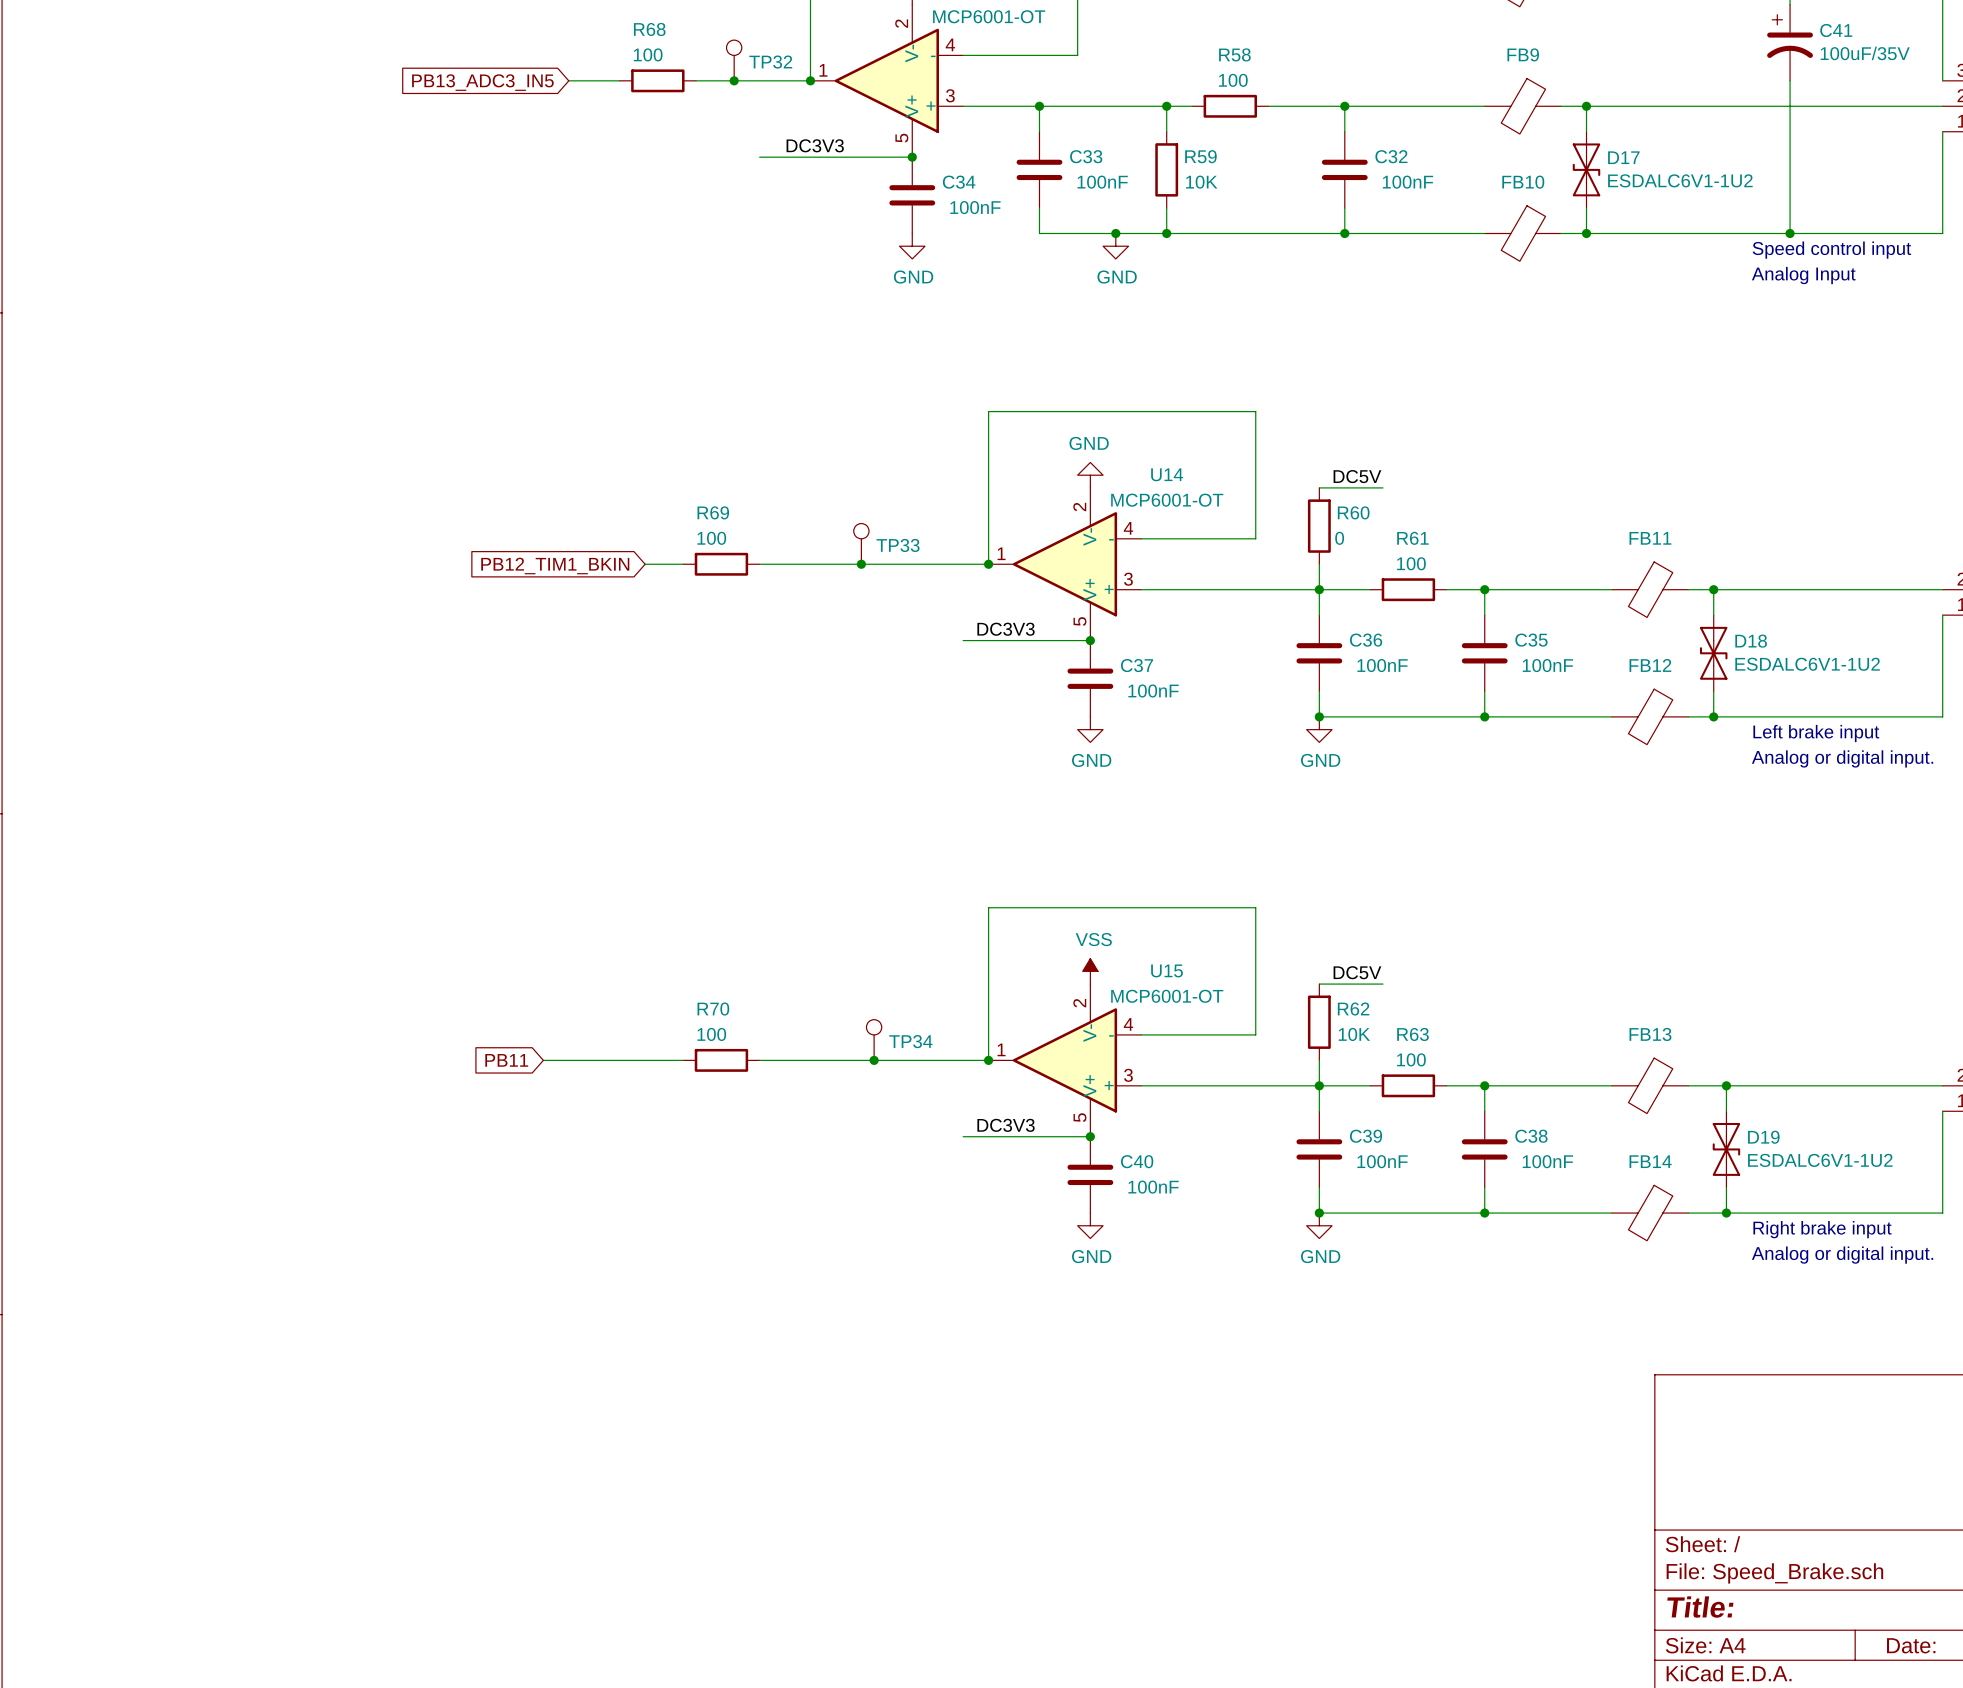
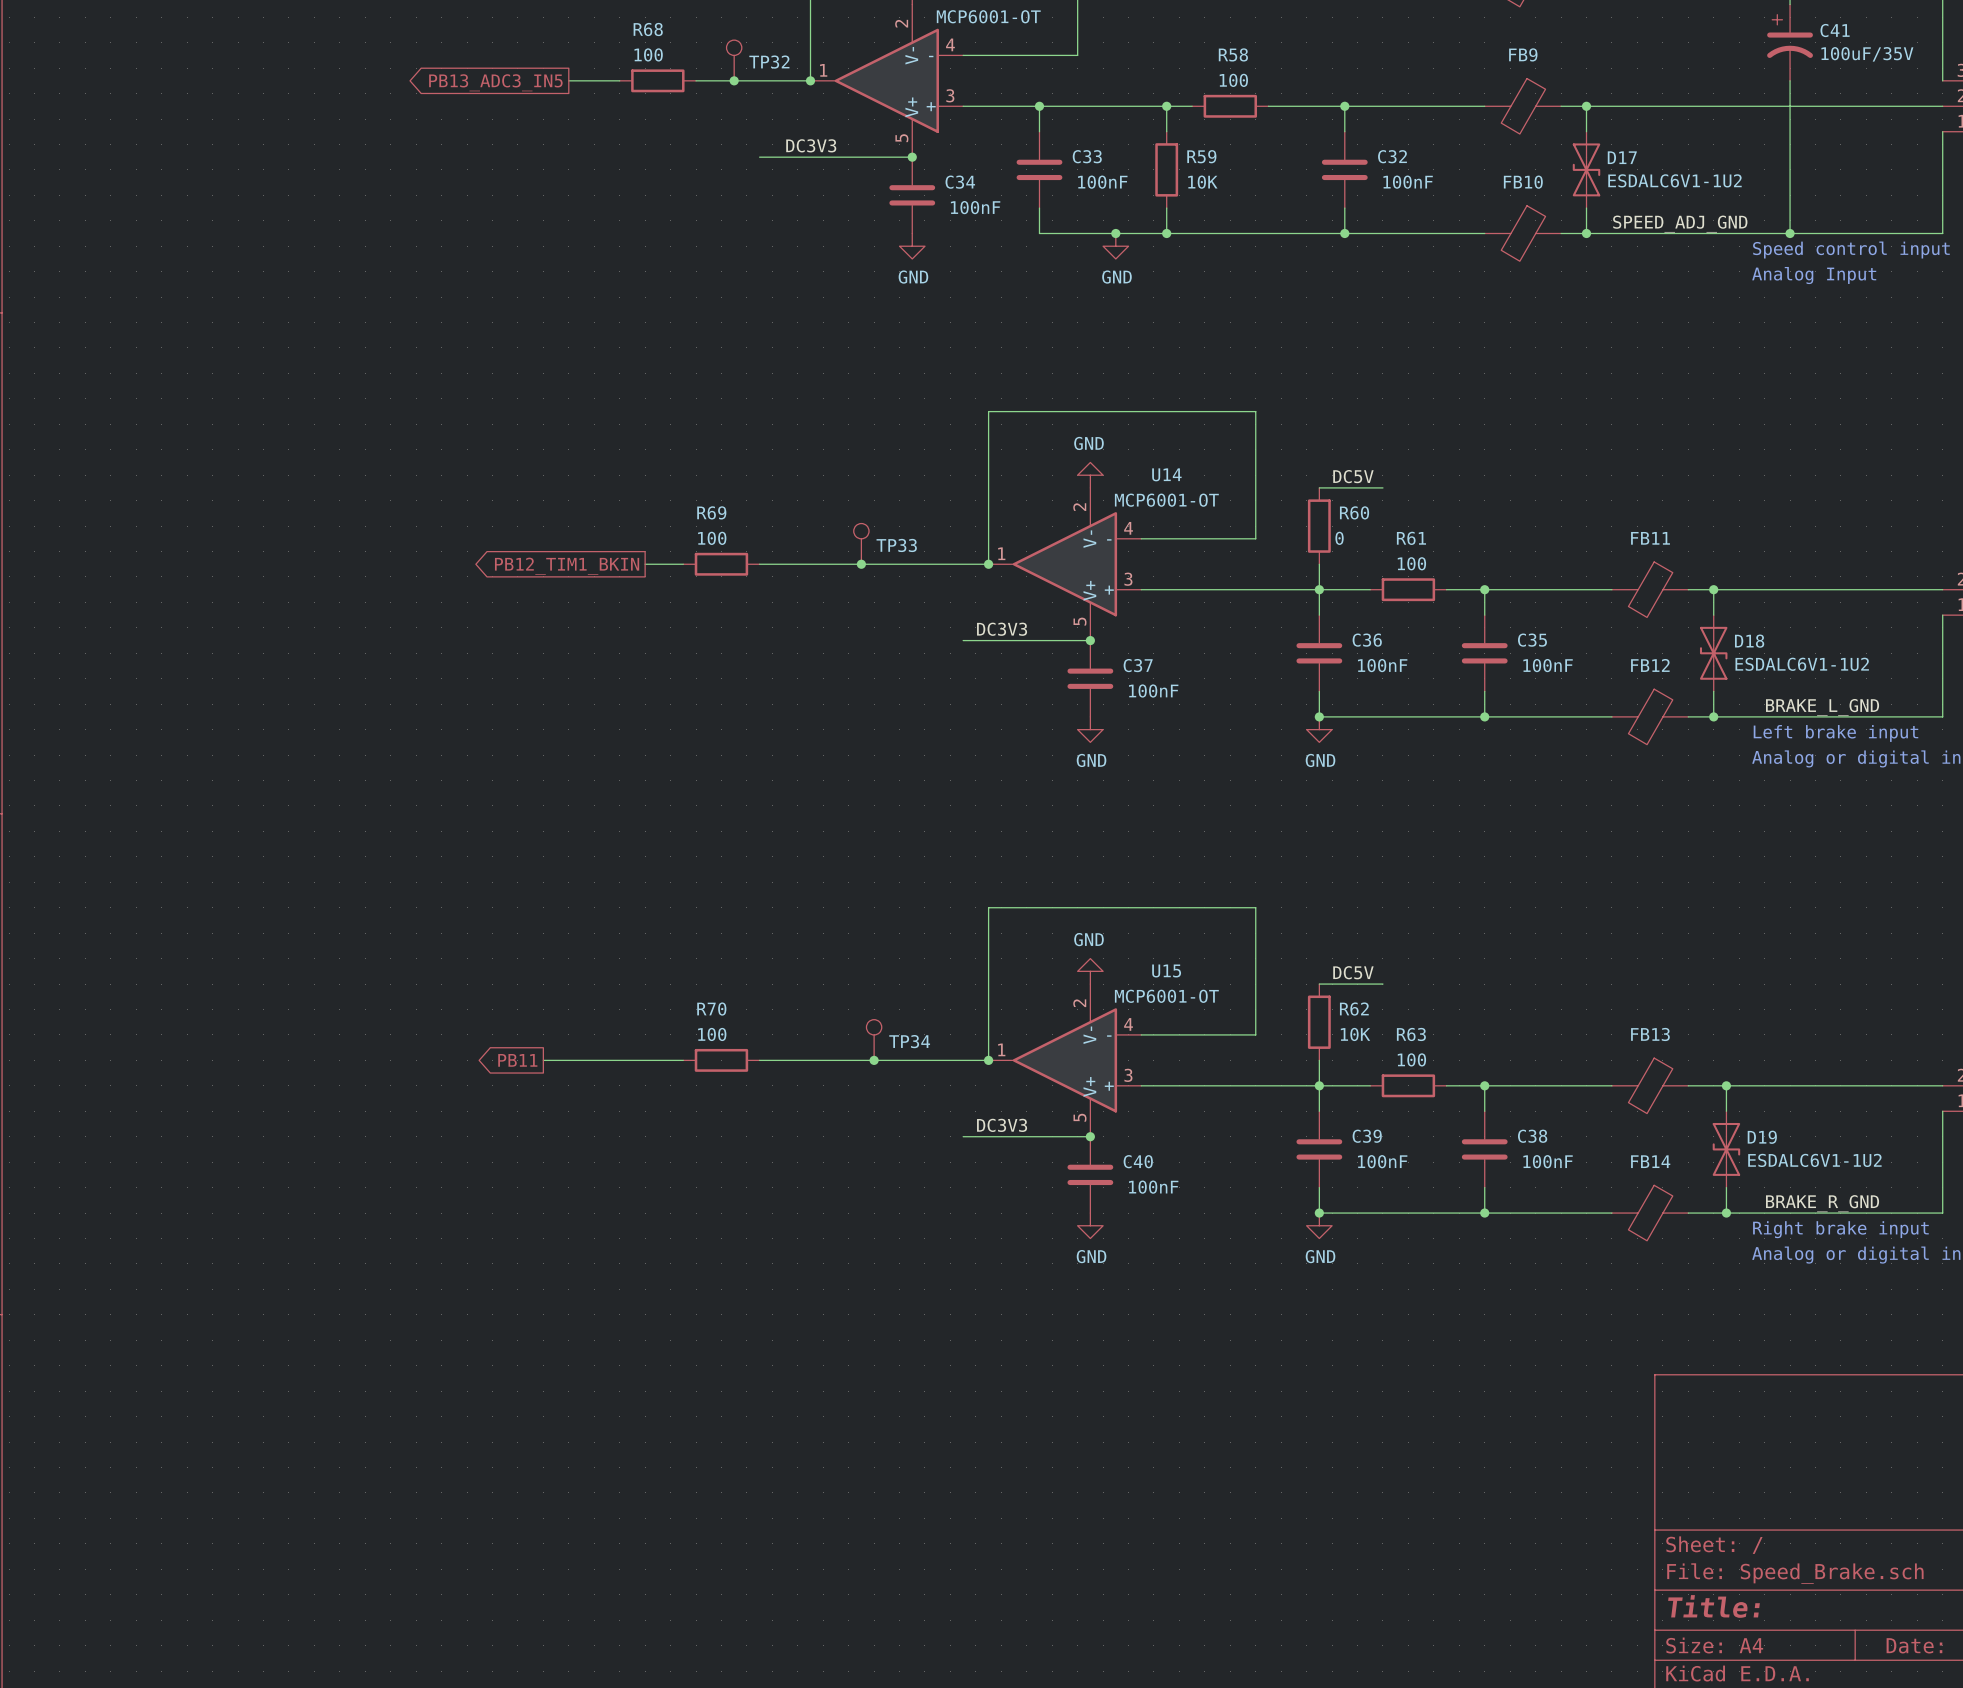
global label shape: input (482, 82) -> output (495, 82)
label: none -> SPEED_ADJ_GND (1680, 224)
global label shape: input (555, 565) -> output (567, 566)
label: none -> BRAKE_L_GND (1822, 707)
power symbol: VSS (1090, 971) -> GND (1090, 971)
global label shape: input (506, 1060) -> output (517, 1060)
label: none -> BRAKE_R_GND (1822, 1203)

